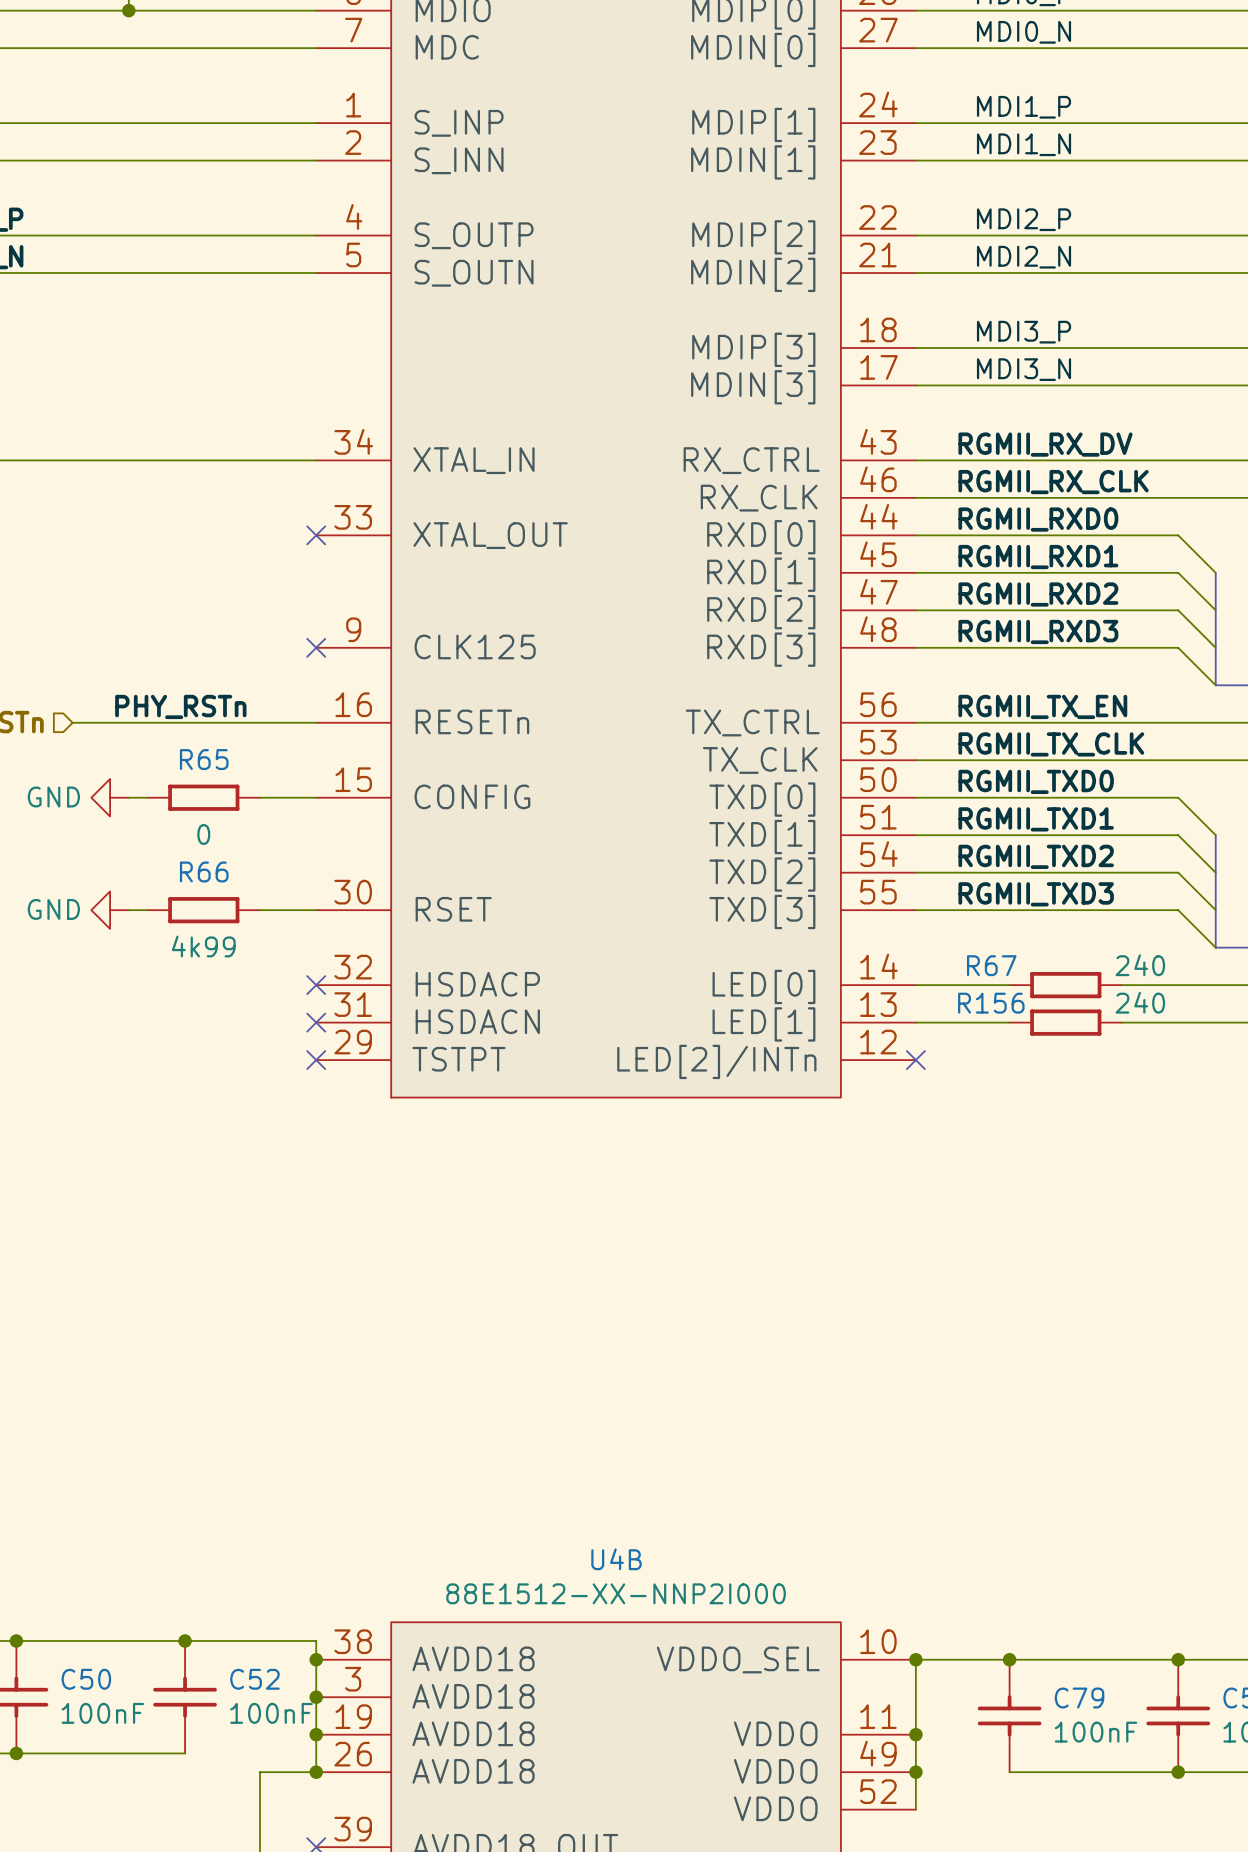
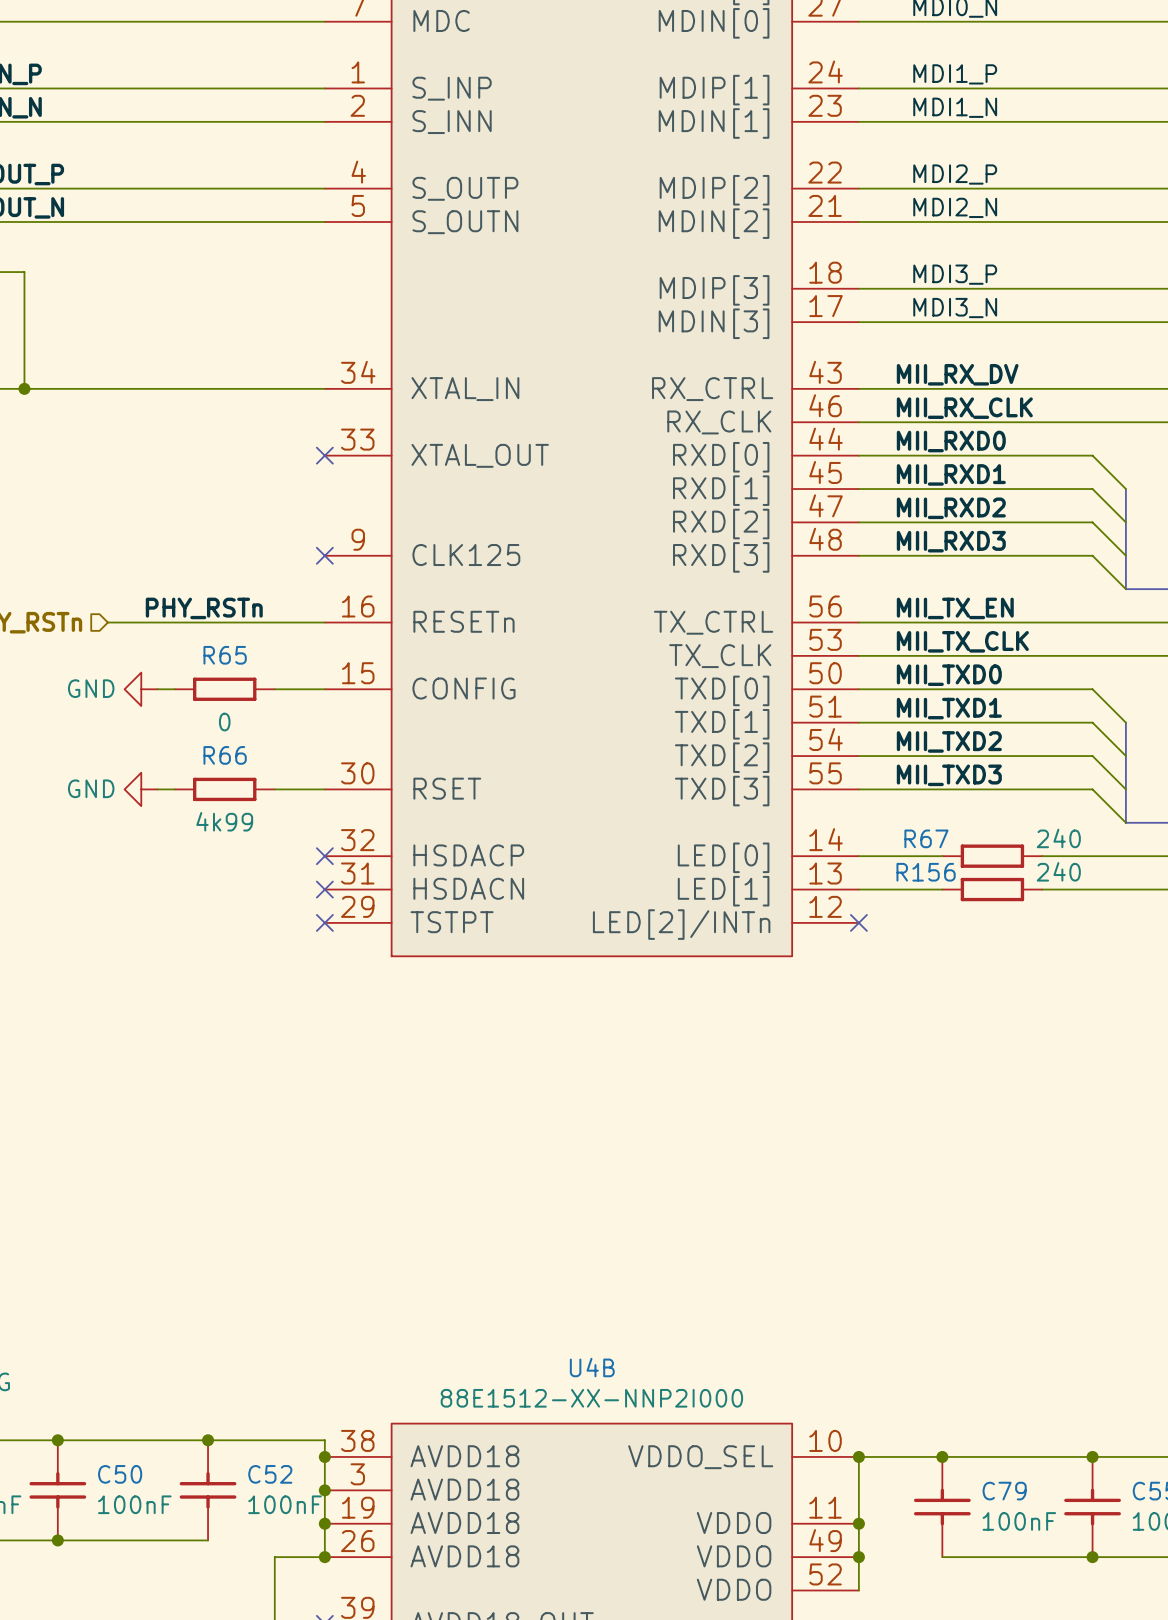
label: RGMII_RX_DV (1045, 444) -> MII_RX_DV (957, 374)
label: RGMII_RX_CLK (1053, 482) -> MII_RX_CLK (964, 408)
label: RGMII_RXD0 (1038, 519) -> MII_RXD0 (951, 441)
label: RGMII_RXD1 (1038, 557) -> MII_RXD1 (951, 474)
label: RGMII_RXD2 (1038, 594) -> MII_RXD2 (951, 508)
label: RGMII_RXD3 (1038, 631) -> MII_RXD3 (951, 541)
label: RGMII_TX_EN (1042, 706) -> MII_TX_EN (955, 608)
label: RGMII_TX_CLK (1051, 744) -> MII_TX_CLK (962, 641)
label: RGMII_TXD0 (1036, 781) -> MII_TXD0 (949, 675)
label: RGMII_TXD1 (1036, 819) -> MII_TXD1 (949, 708)
label: RGMII_TXD2 (1036, 856) -> MII_TXD2 (949, 741)
label: RGMII_TXD3 (1036, 894) -> MII_TXD3 (949, 775)

